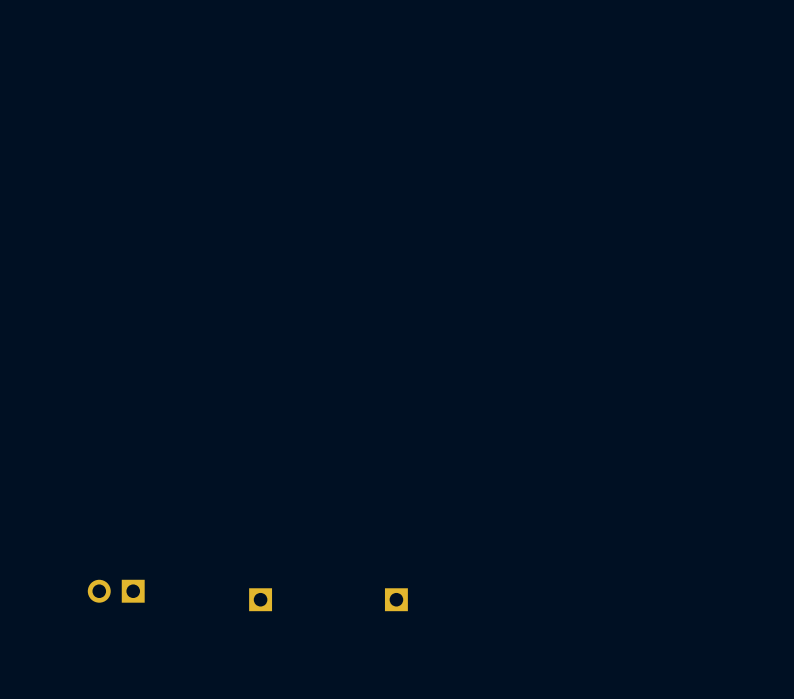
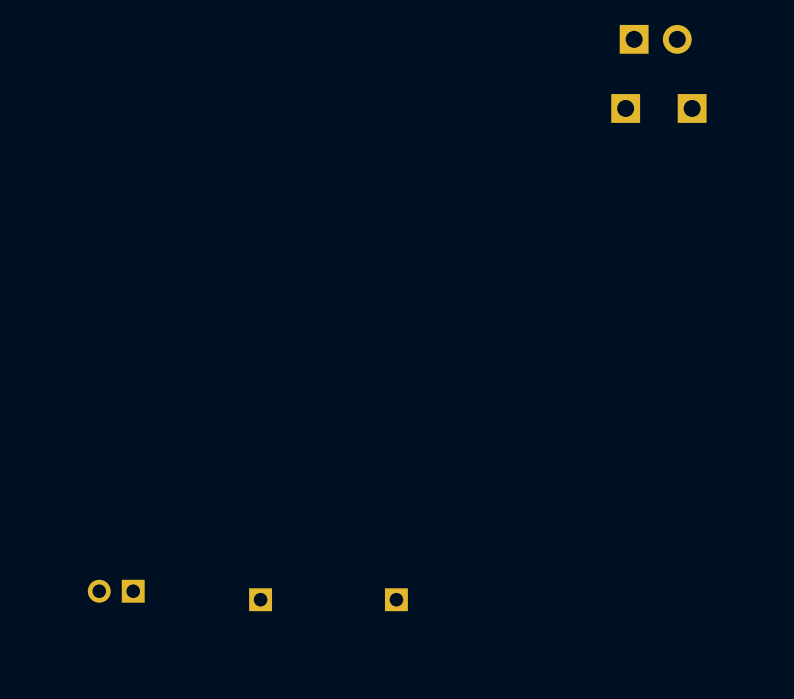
part: none -> (655, 39)
part: none -> (625, 108)
part: none -> (692, 108)

